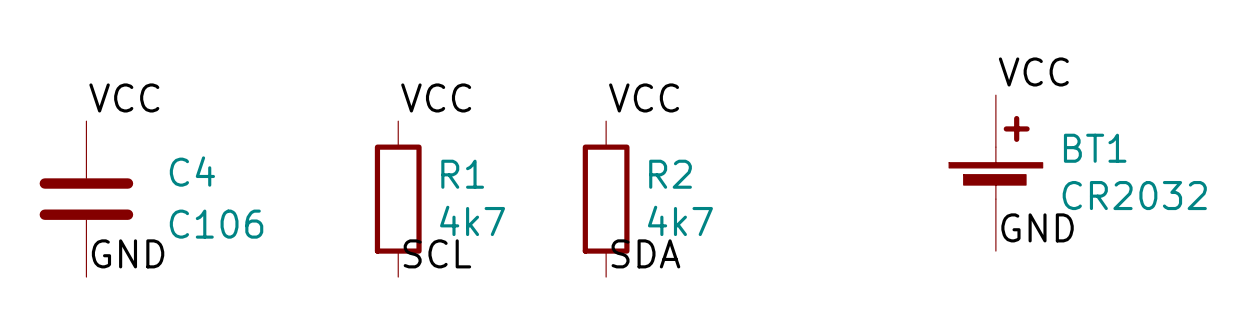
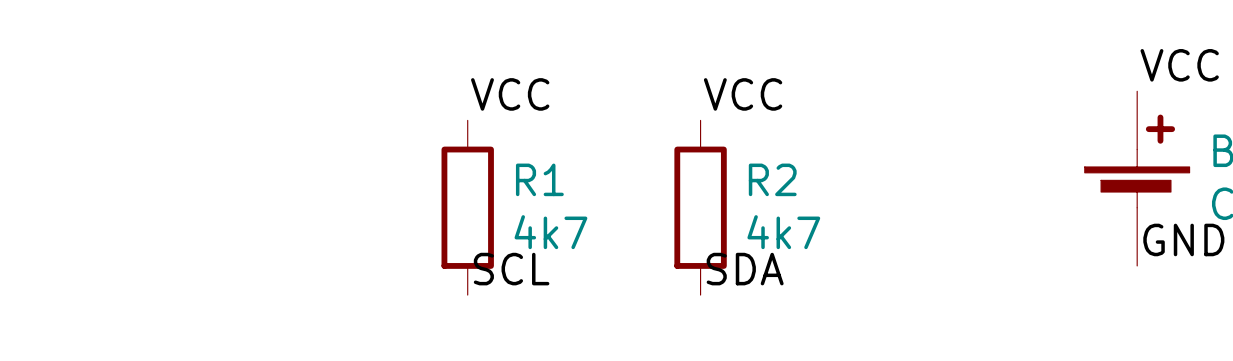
label: VCC (124, 97) -> none
C4: C106 (86, 199) -> none
label: GND (128, 253) -> none

